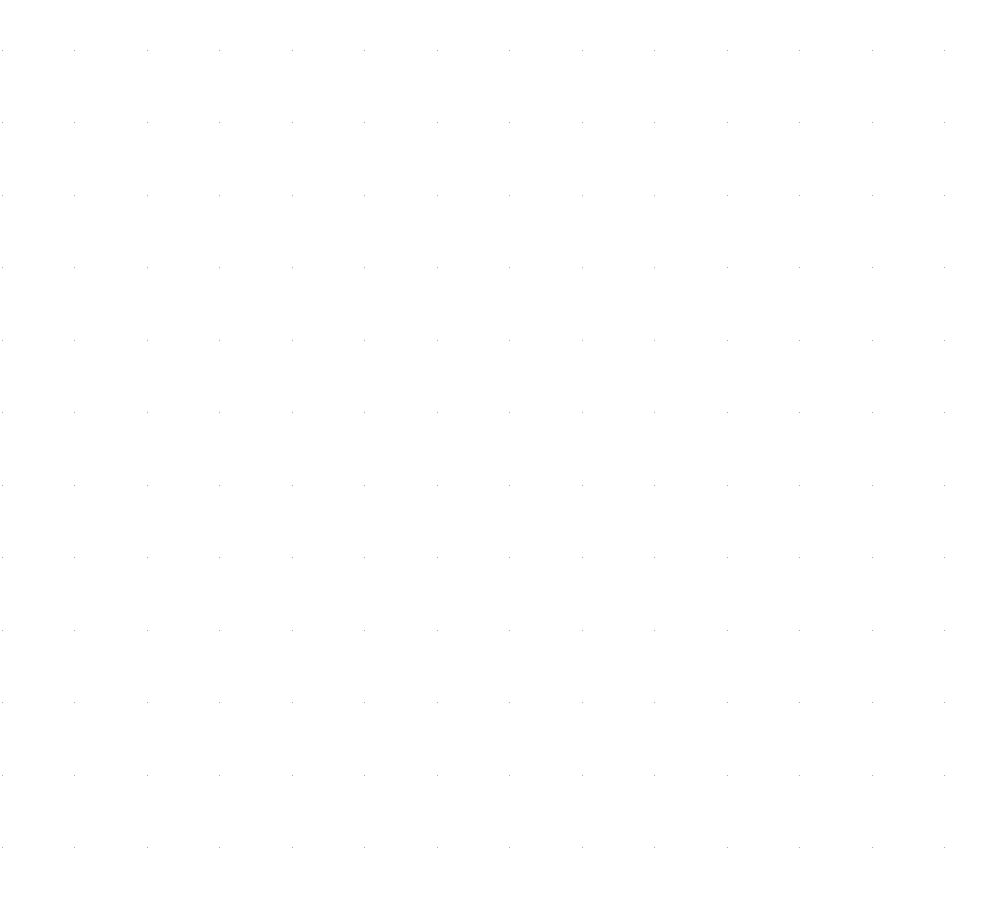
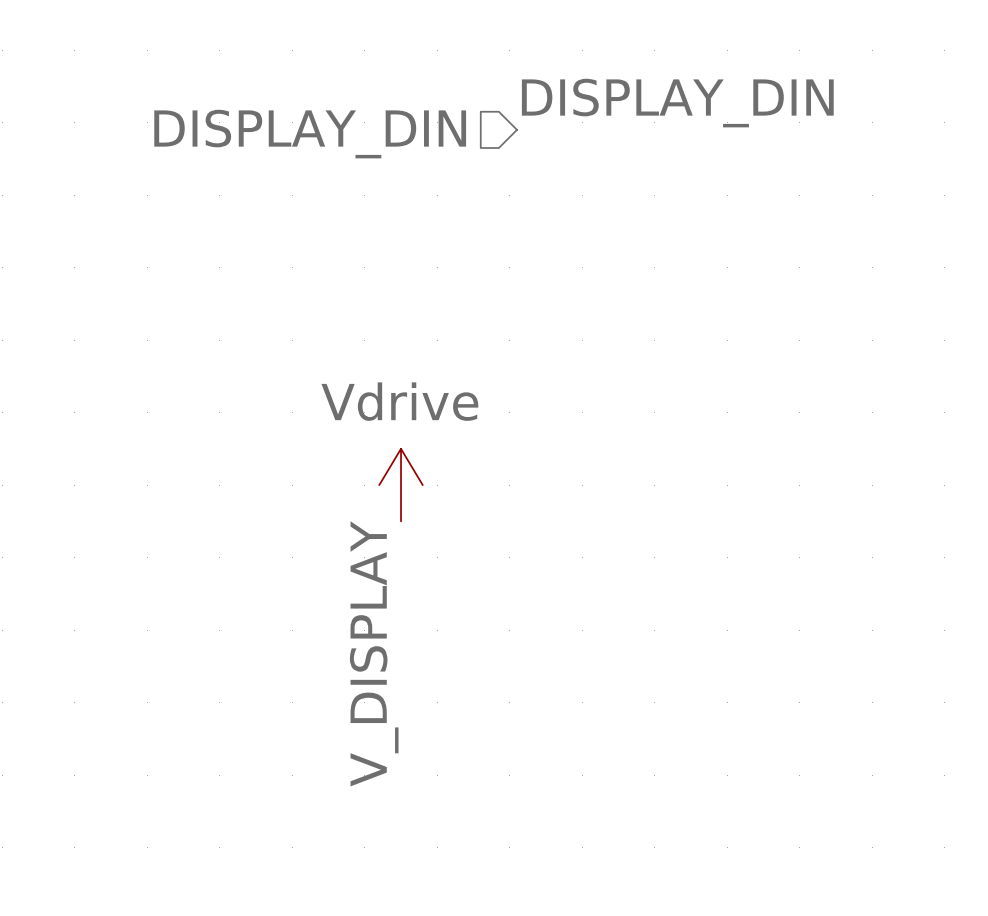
label: none -> DISPLAY_DIN (677, 103)
hierarchical label: none -> DISPLAY_DIN (310, 134)
power symbol: none -> Vdrive (401, 485)
label: none -> V_DISPLAY (374, 653)

